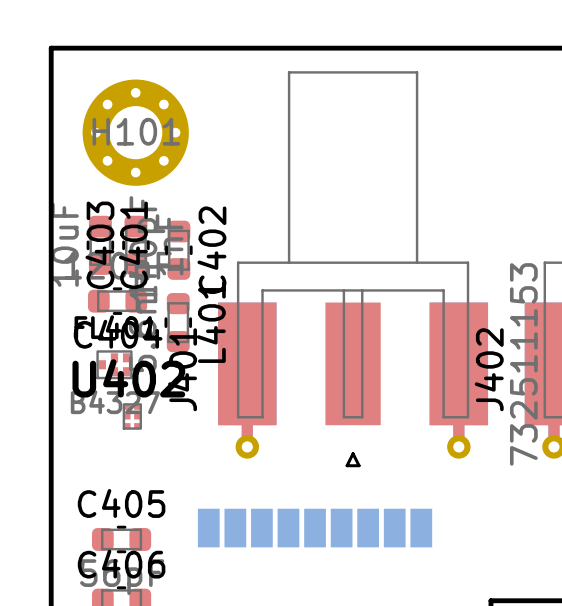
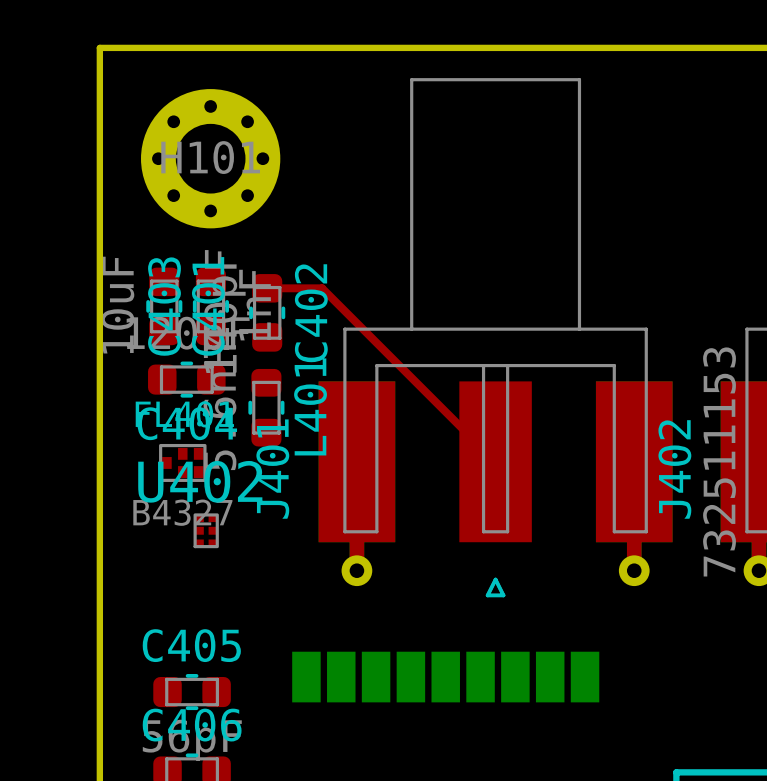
top track: none -> (267, 288) (322, 288) (495, 461)

